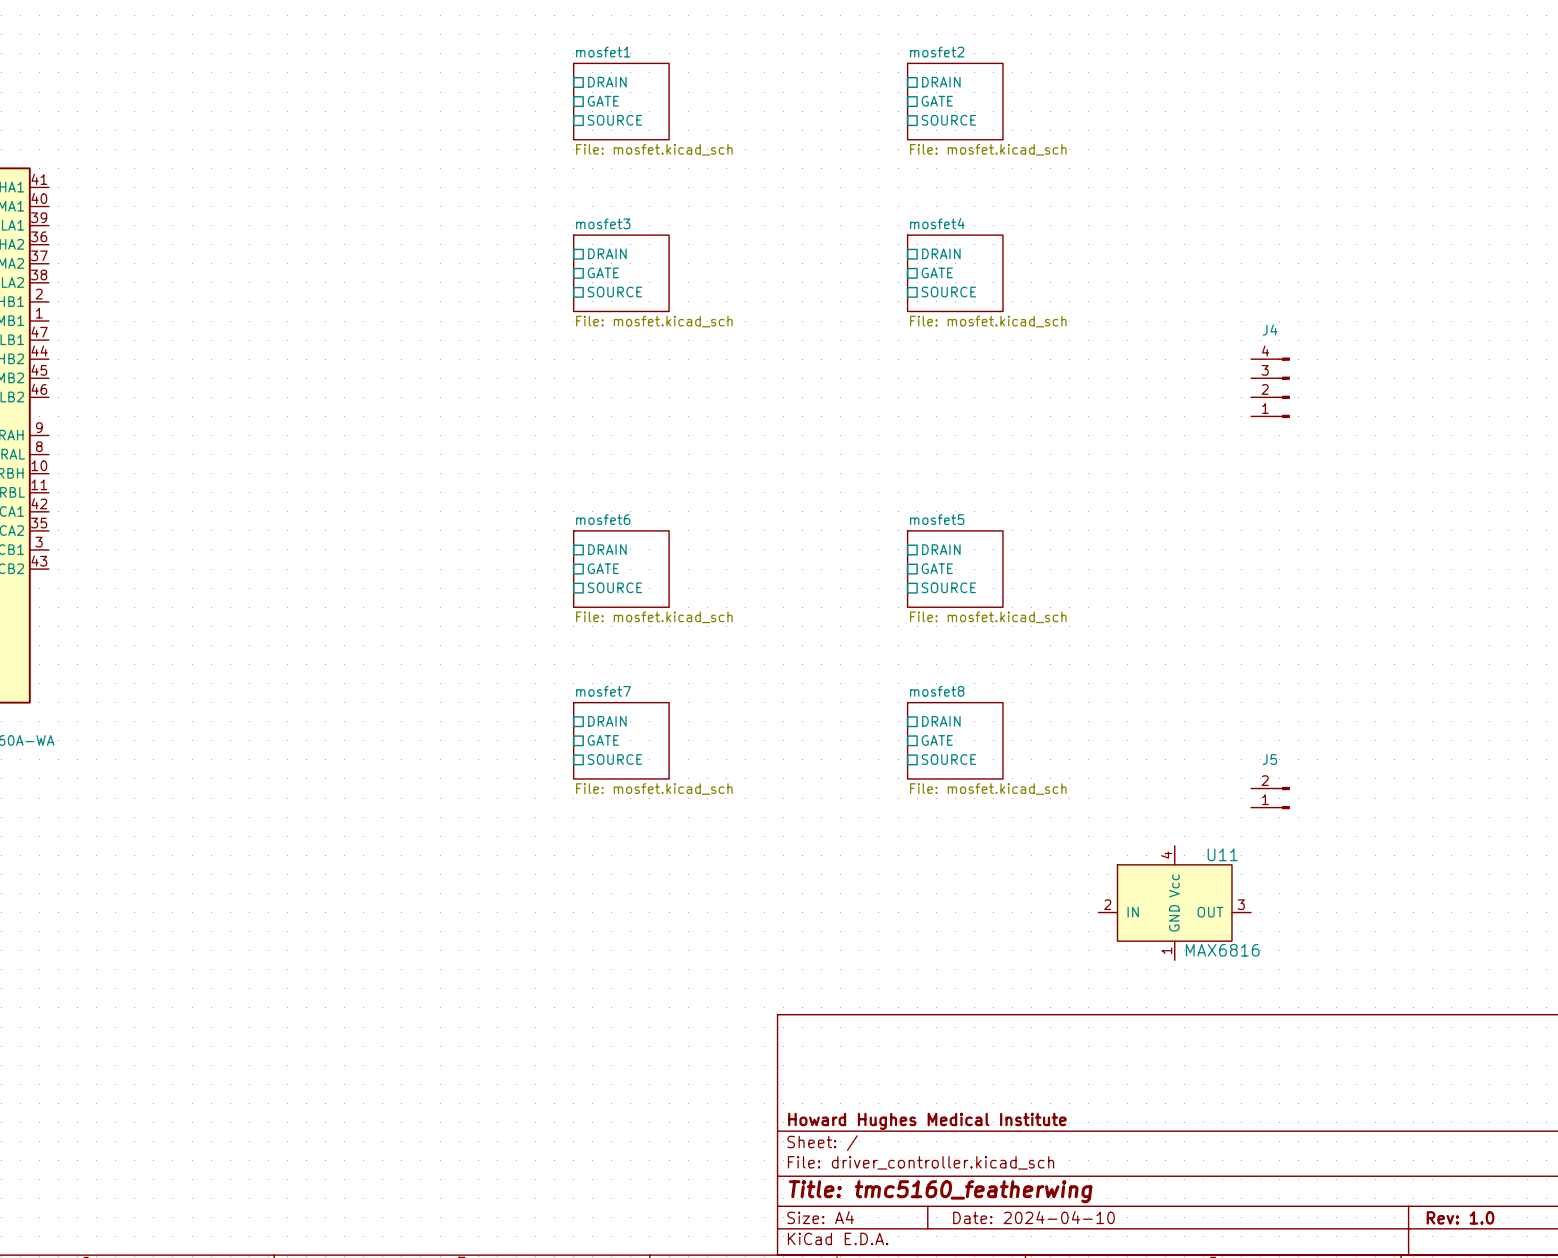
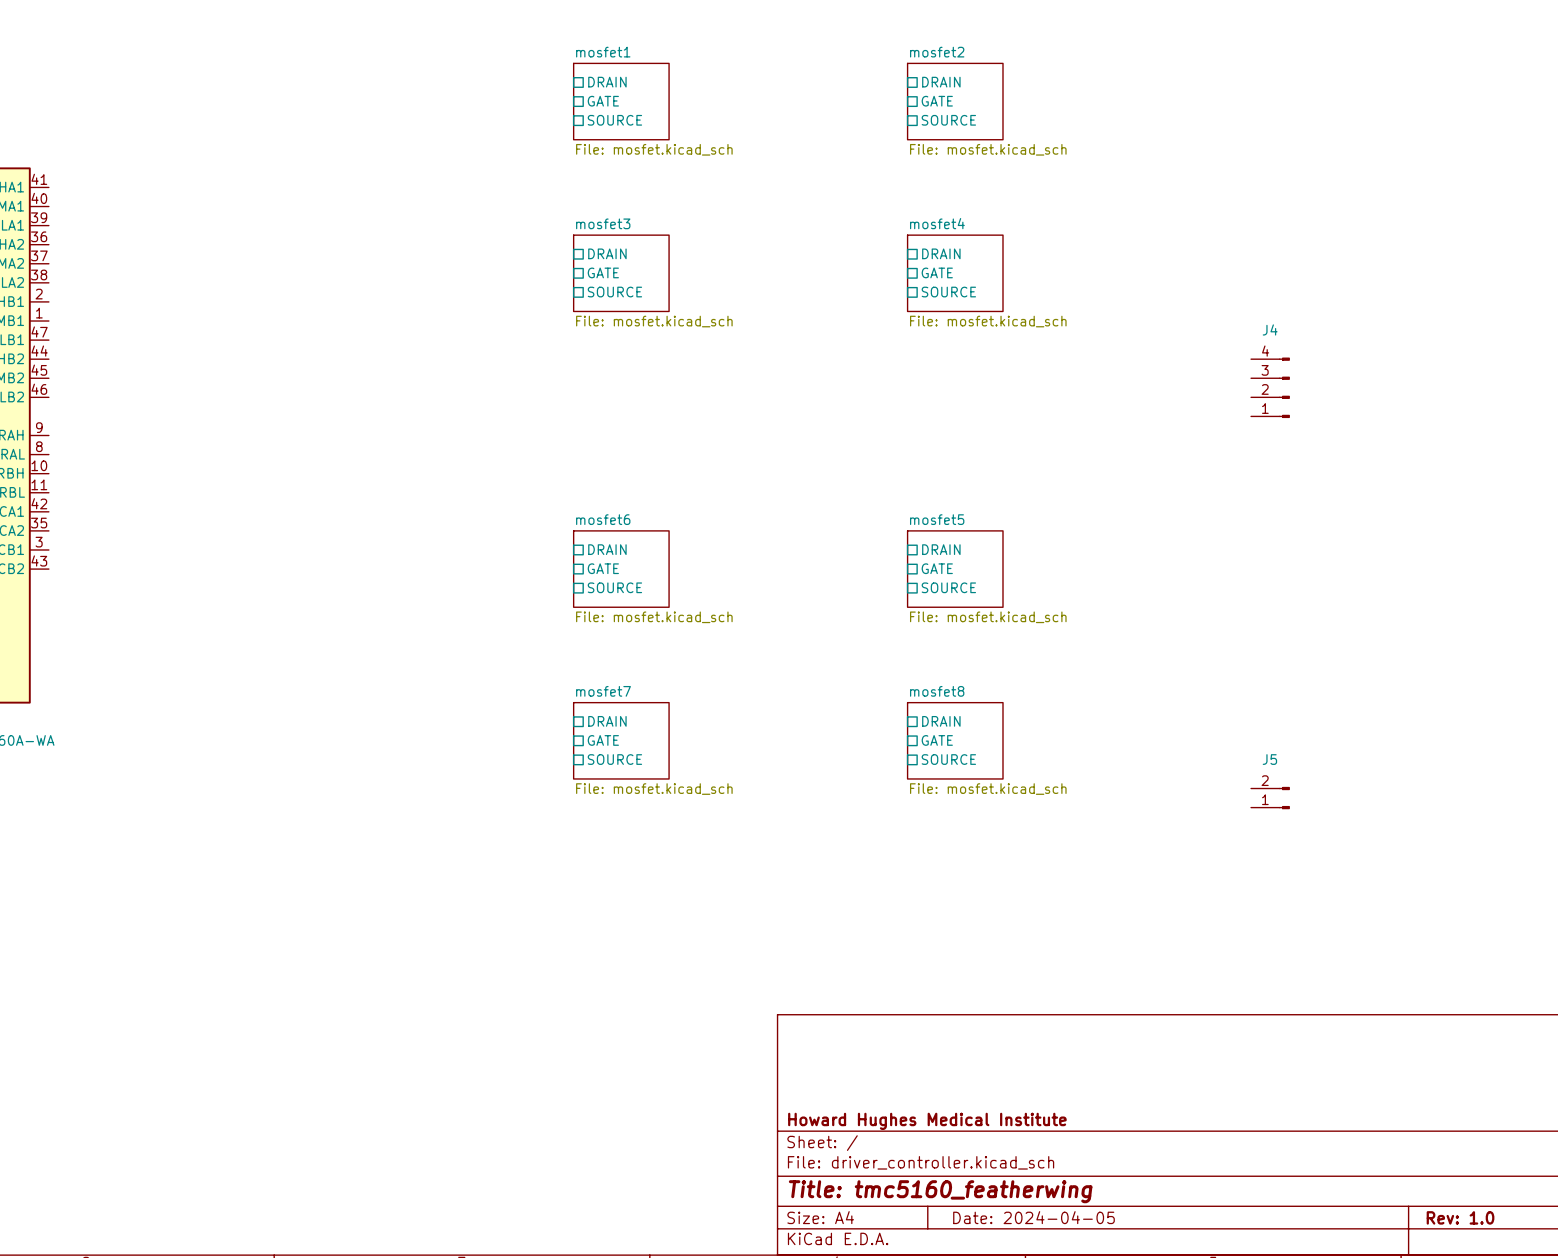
U11: MAX6816 (1174, 903) -> none
title block: Date: 2024-04-10 (1033, 1217) -> Date: 2024-04-05 (1033, 1217)

